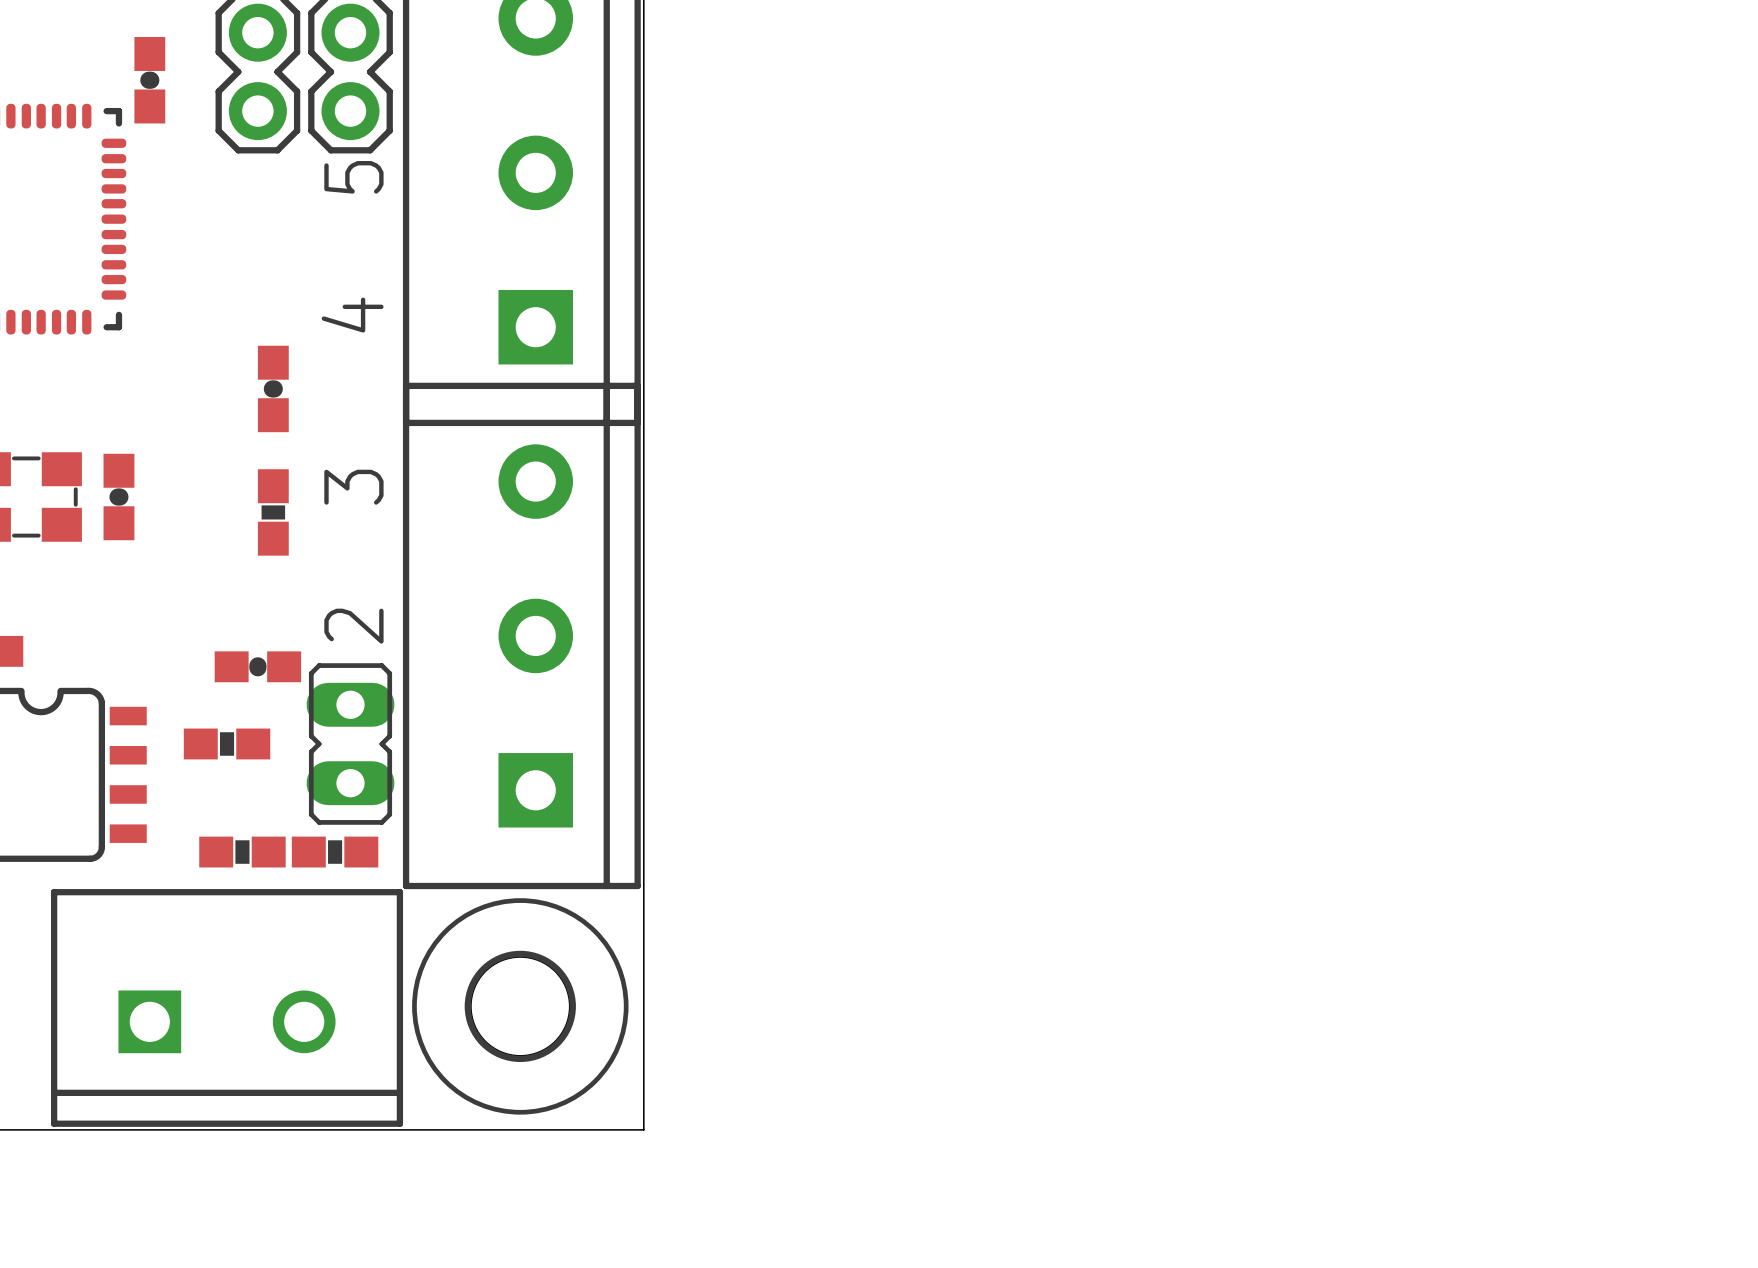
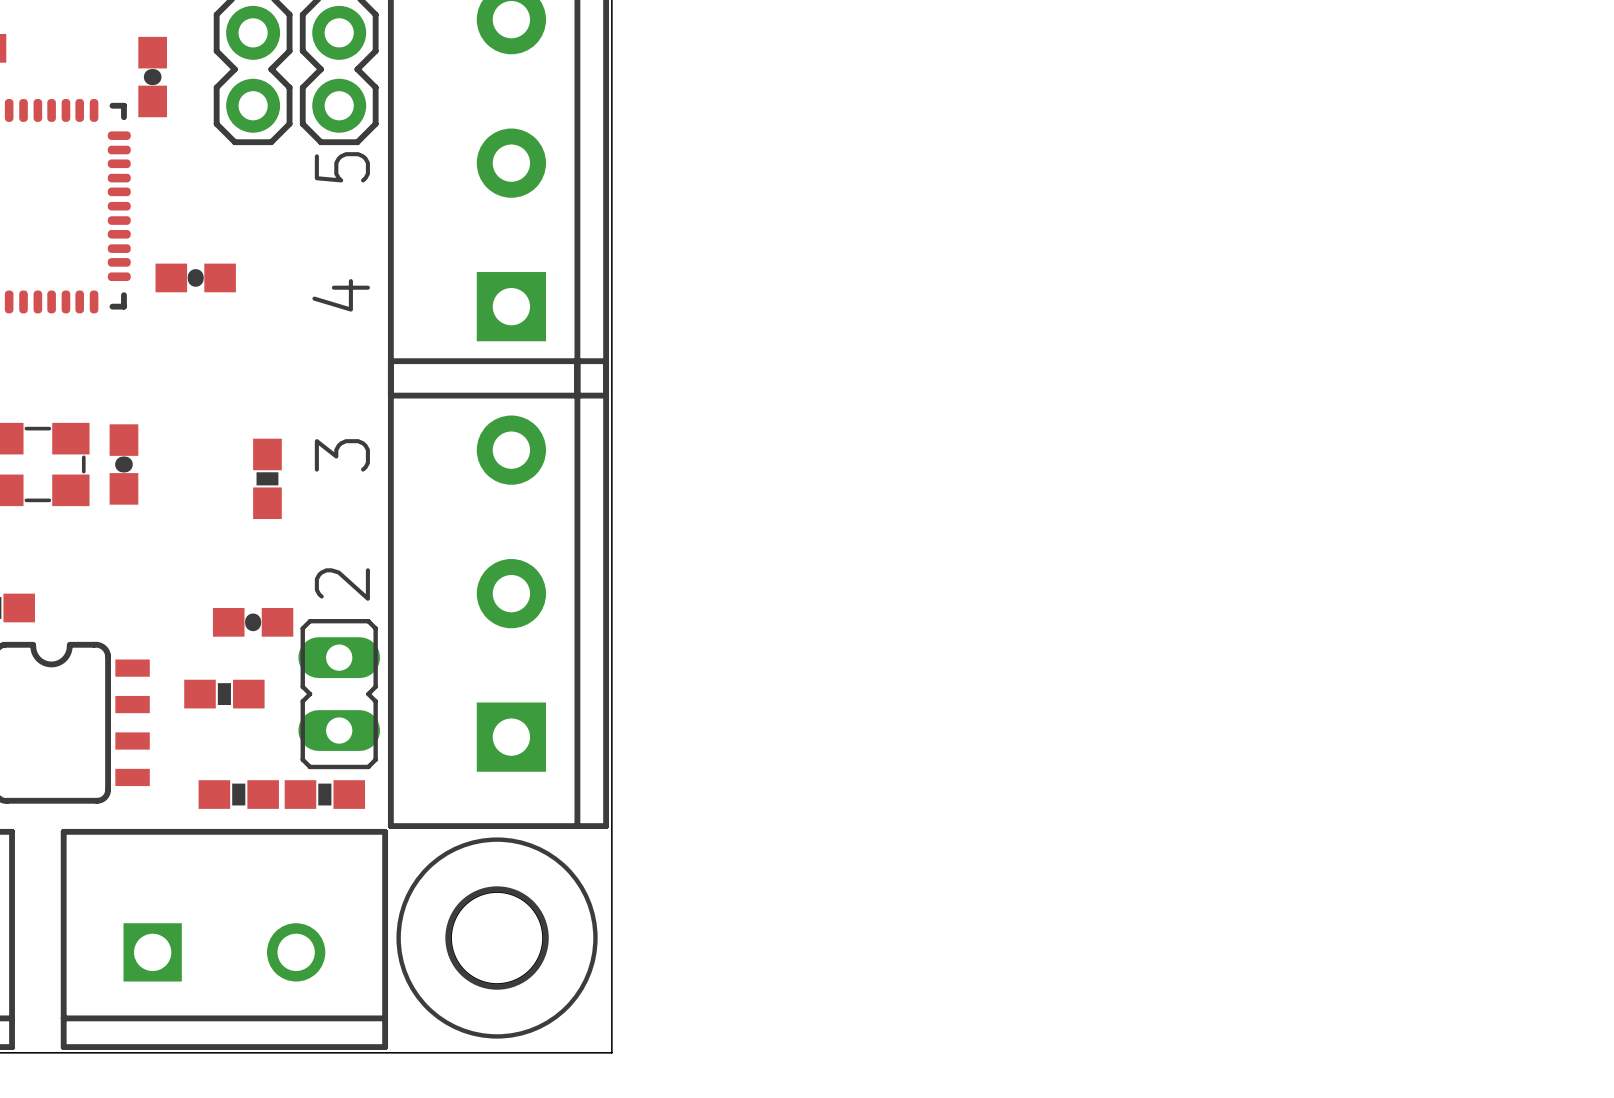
part rotation: 0° (273, 388) -> 90° clockwise (195, 277)
part position: (273, 388) -> (195, 277)

